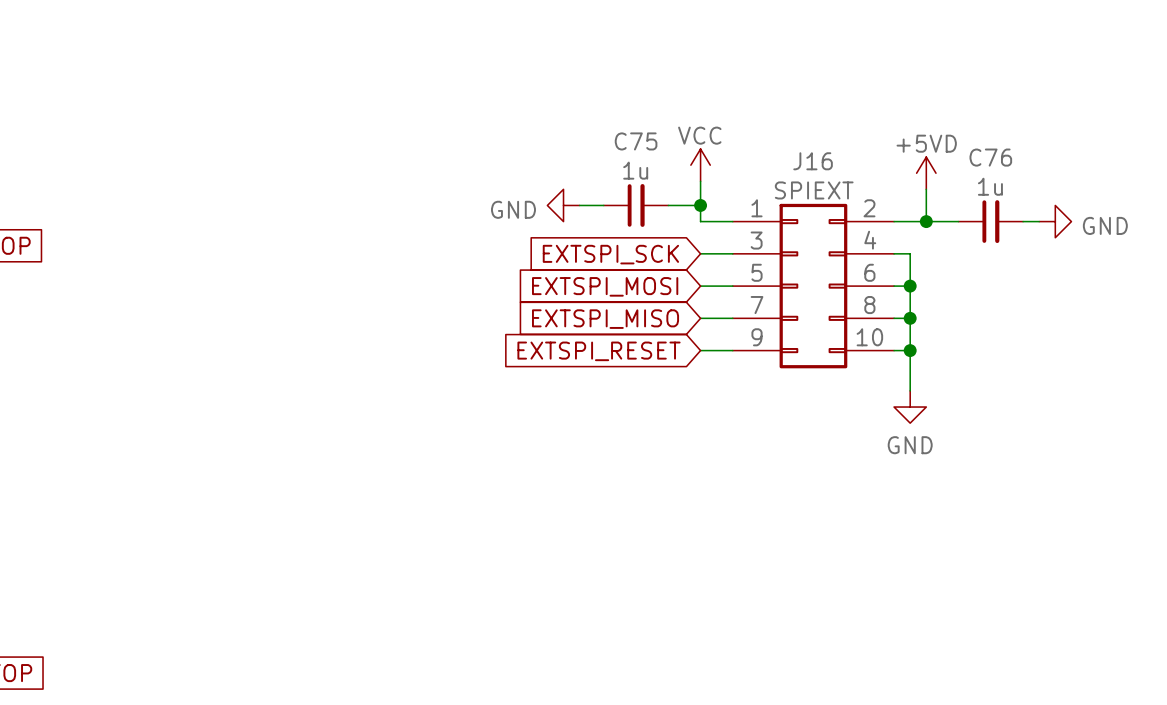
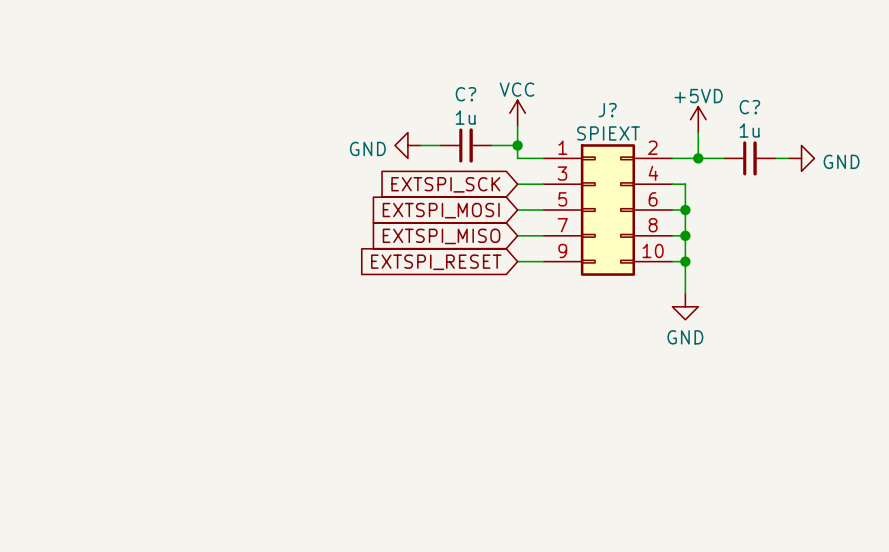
C75 name: C75 (636, 141) -> C? (465, 94)
C76 name: C76 (990, 157) -> C? (749, 107)
J16 name: J16 (813, 161) -> J? (607, 110)

